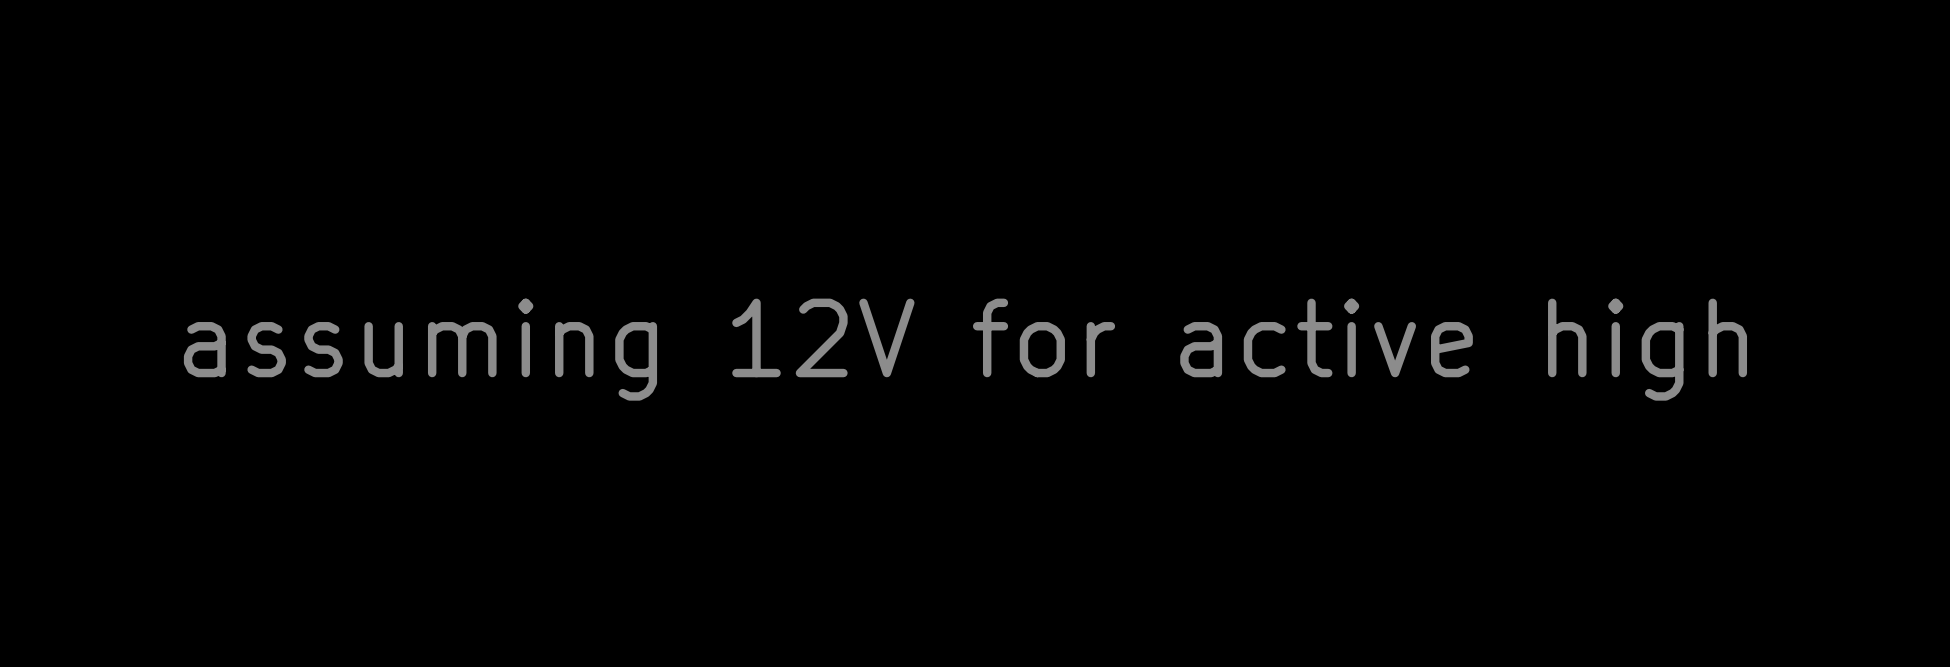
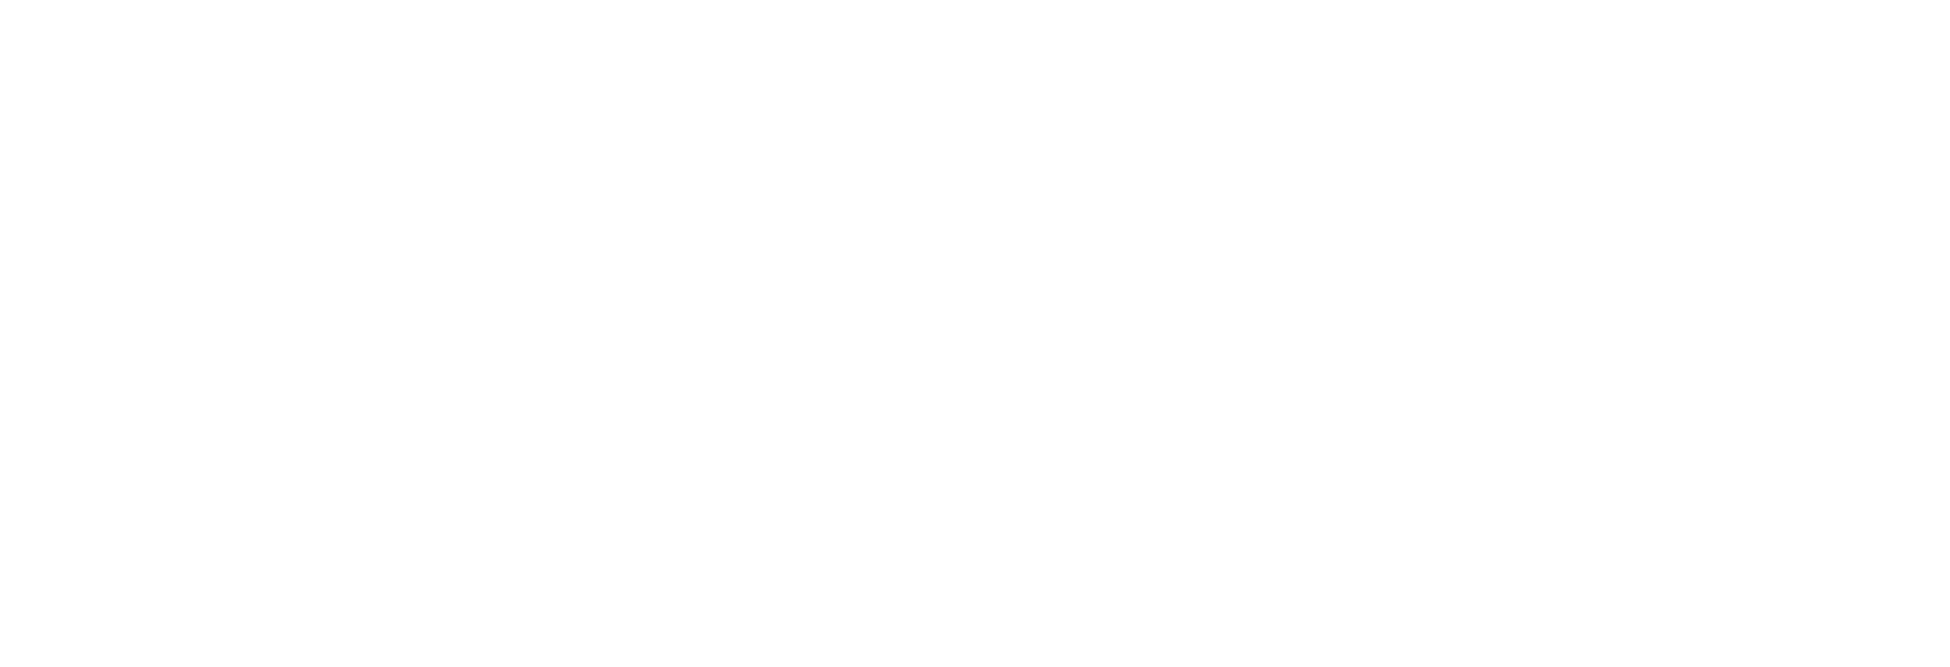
text: assuming 12V for active high (965, 349) -> none

